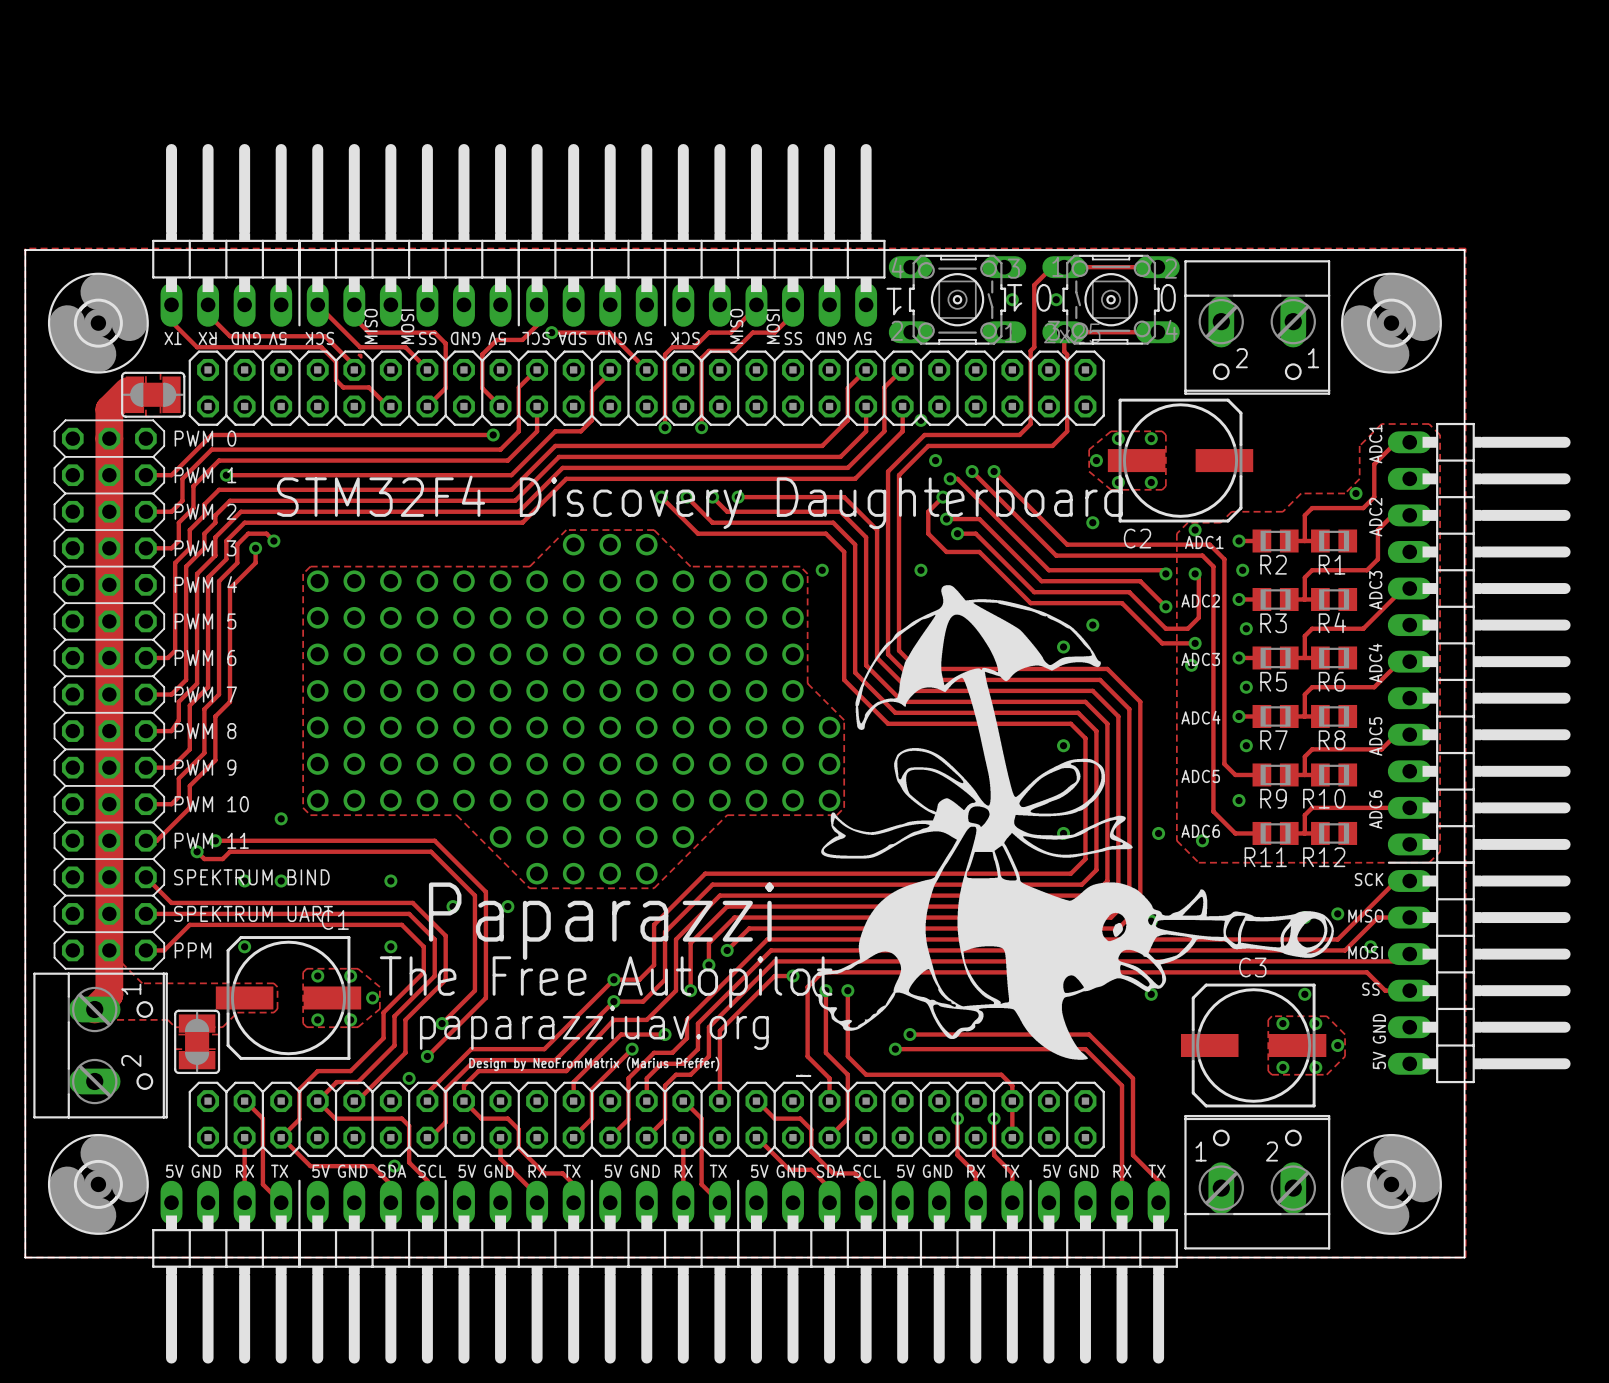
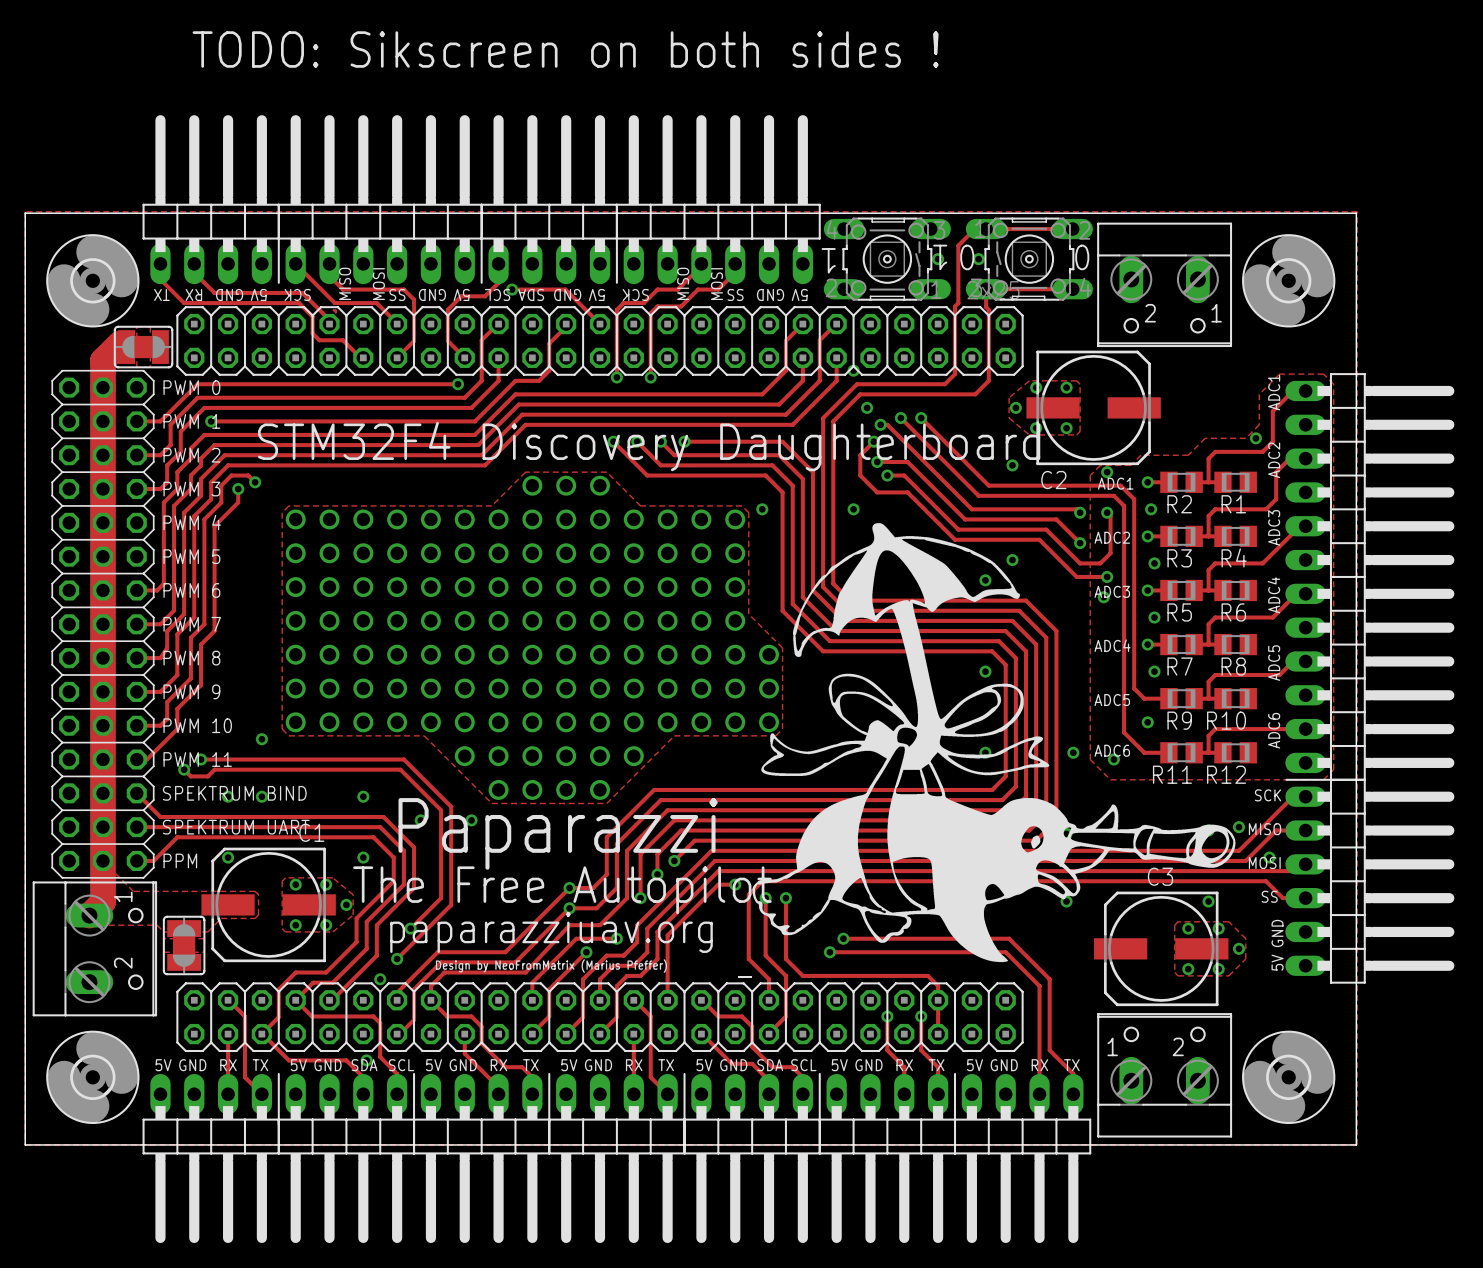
text: none -> TODO: Sikscreen on both sides ! (565, 49)

